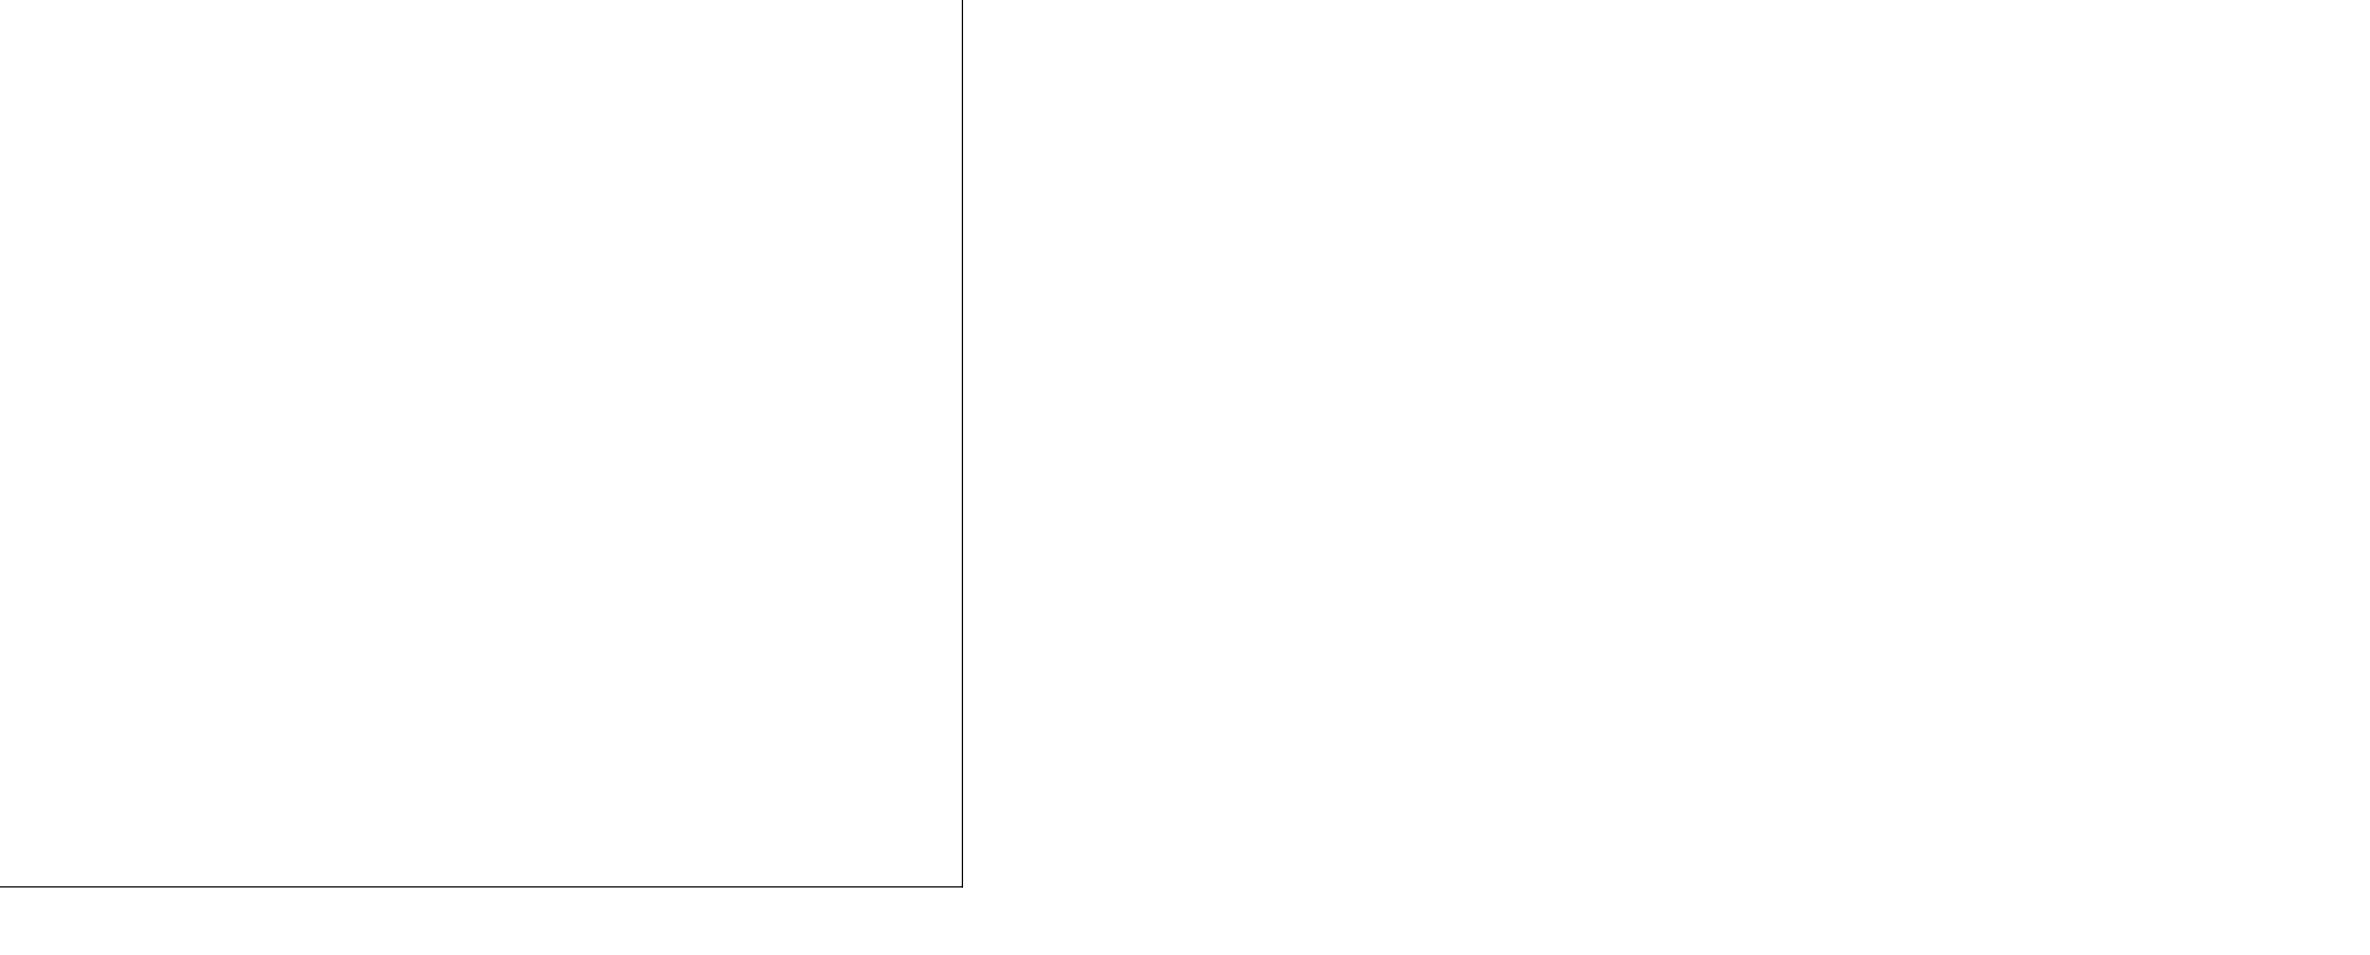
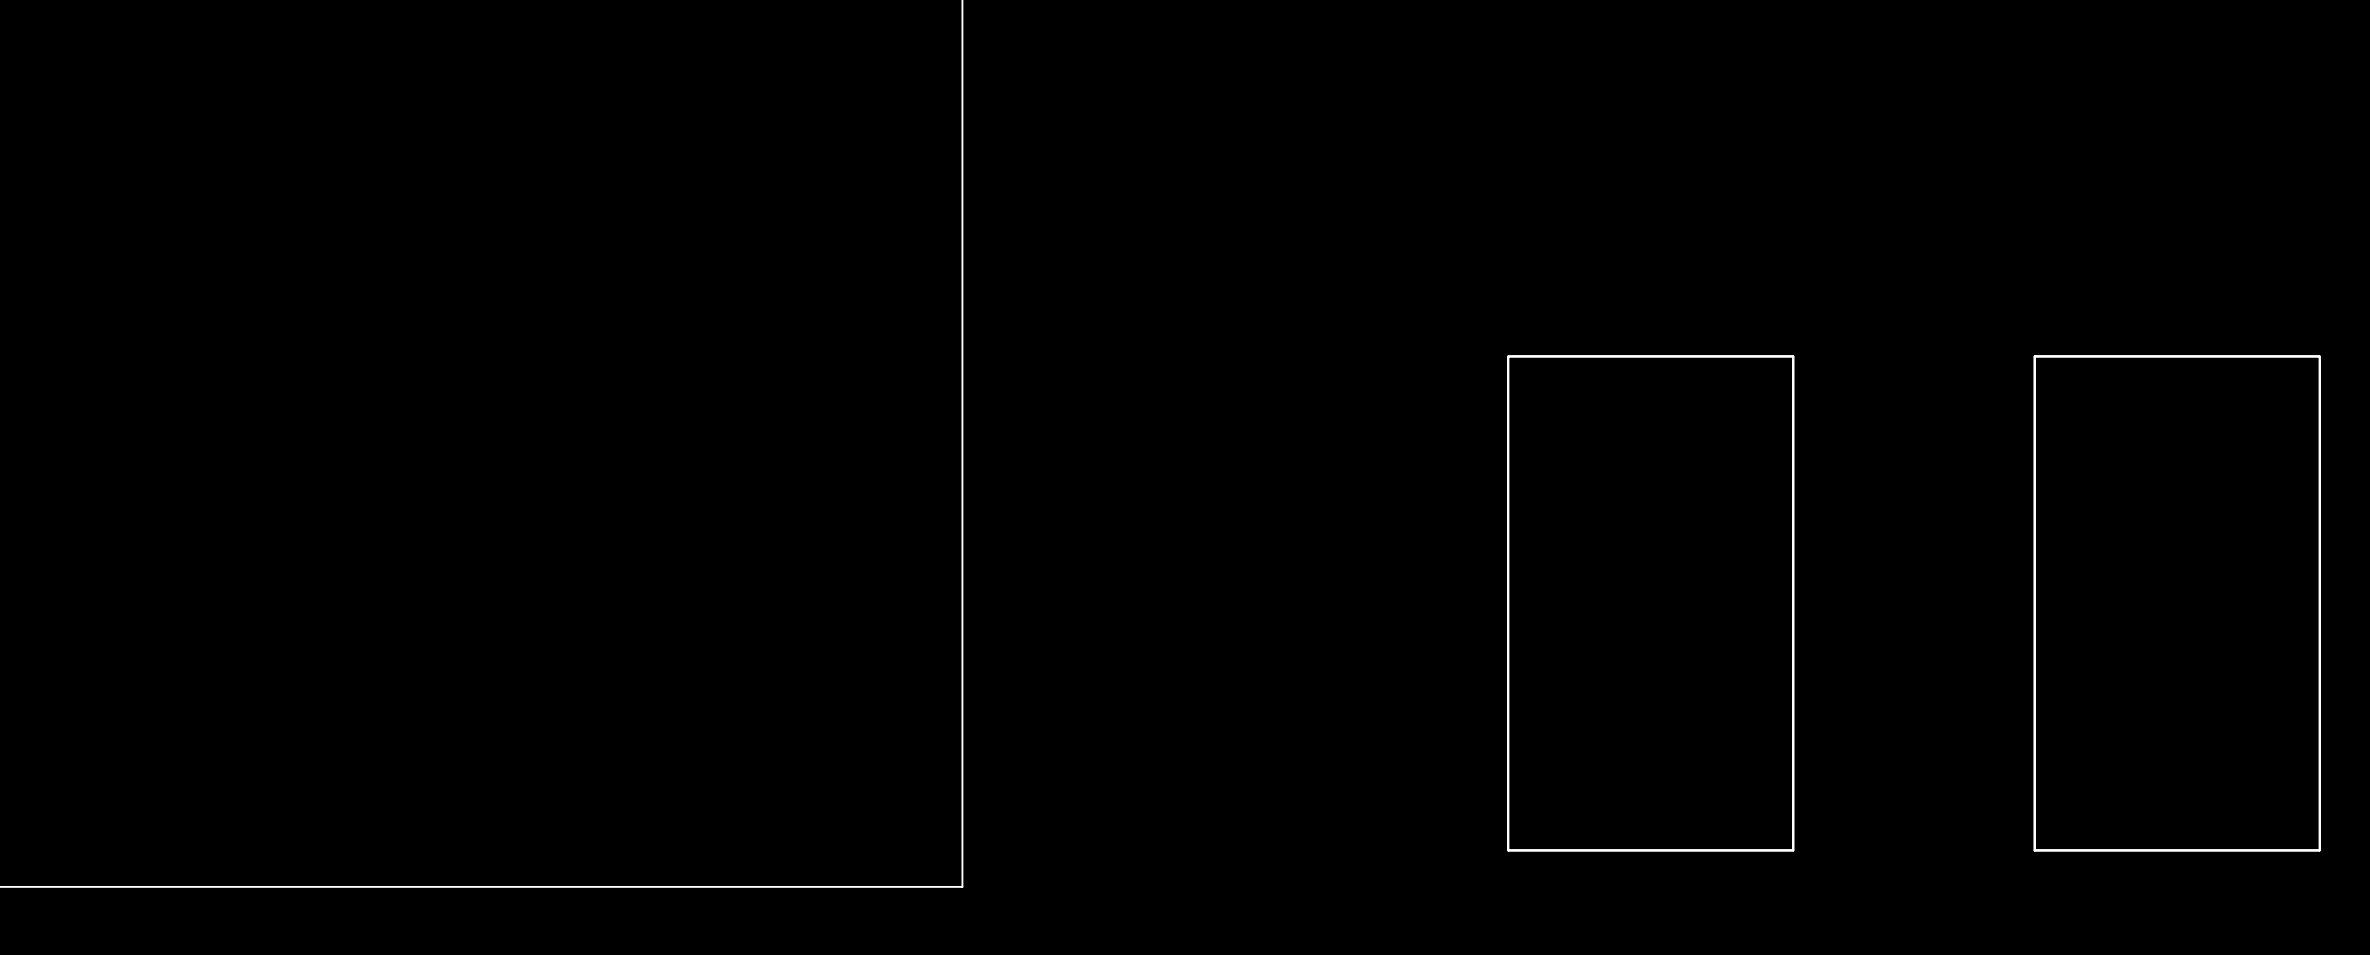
part: none -> (1650, 603)
part: none -> (2177, 603)

